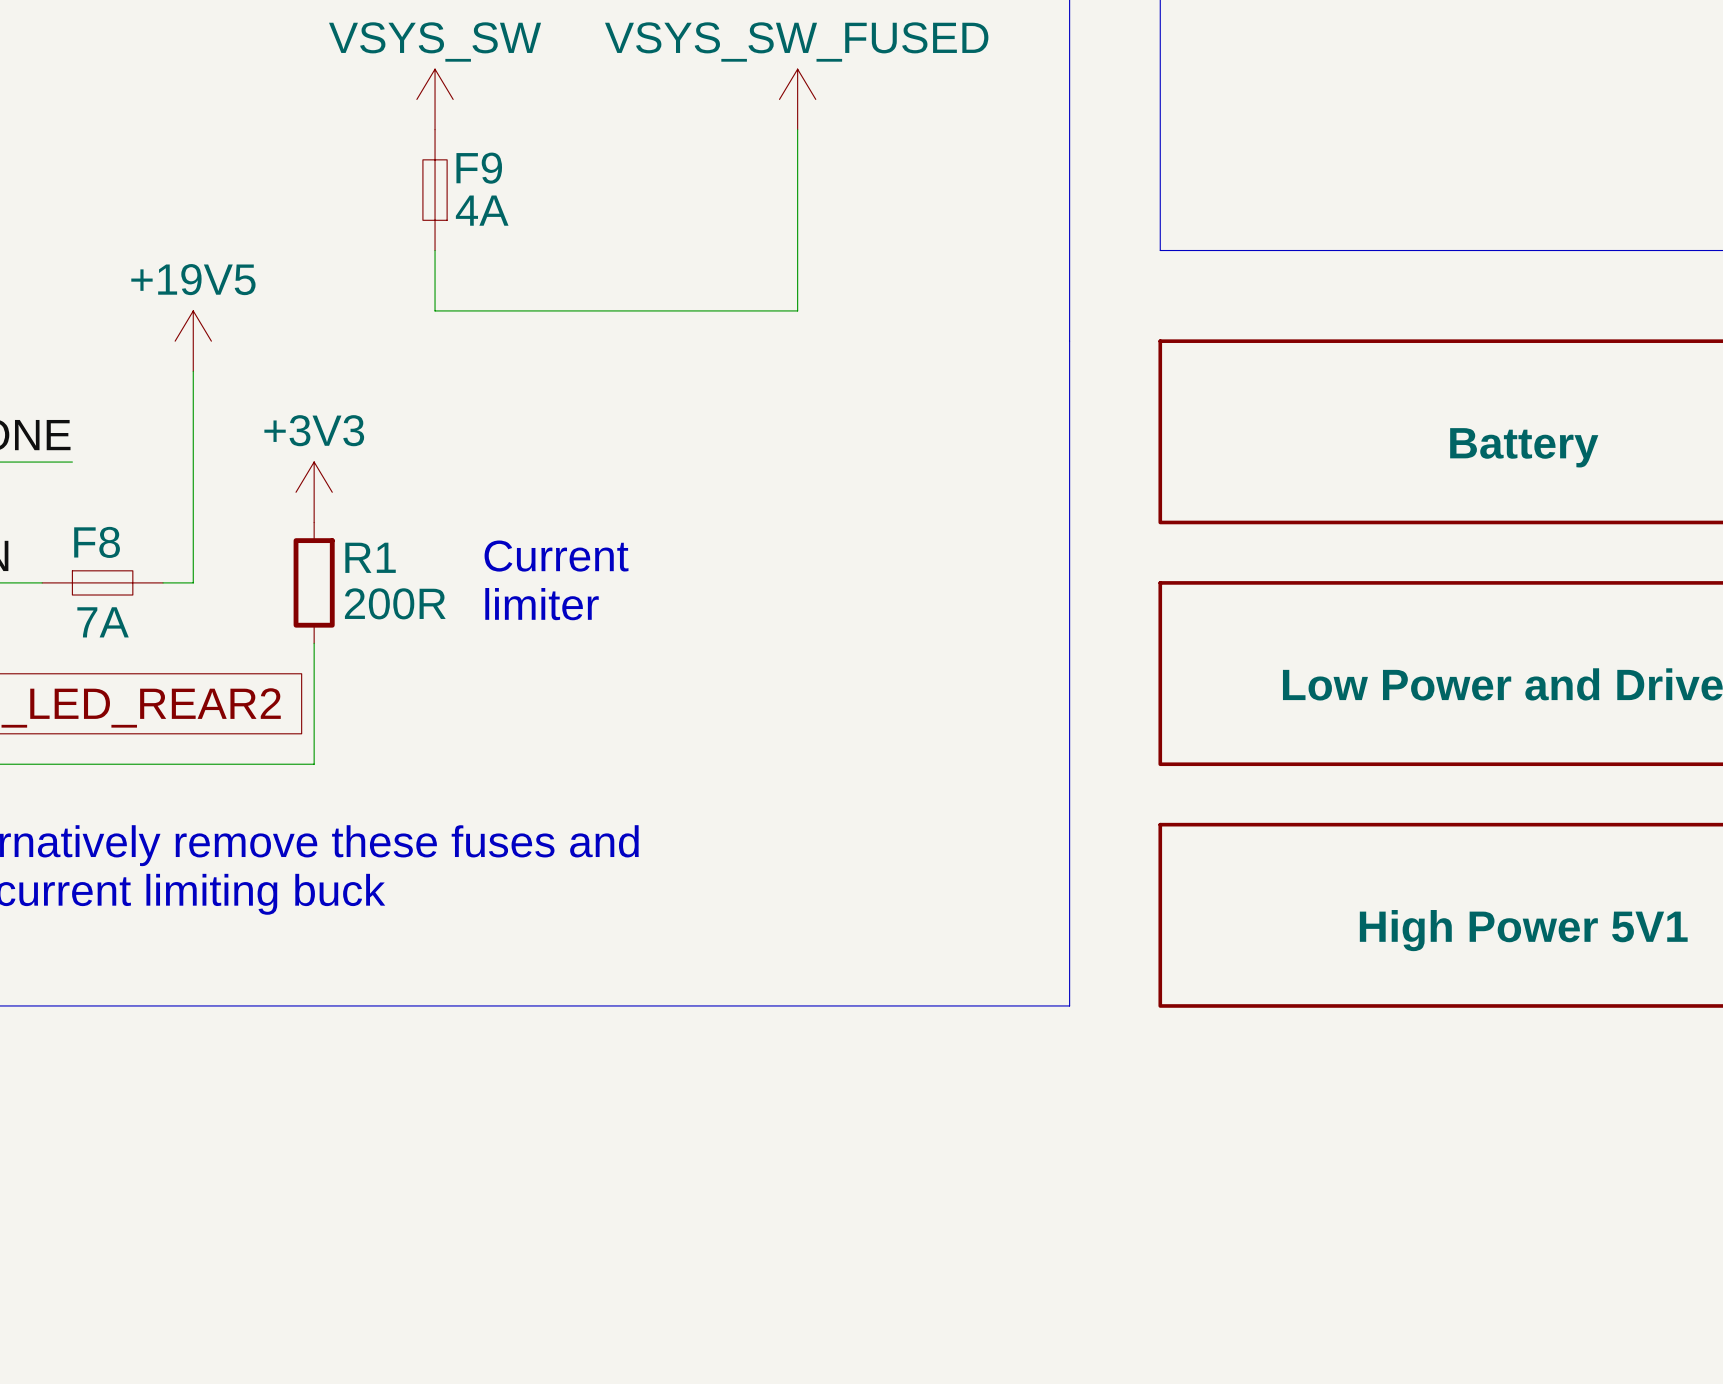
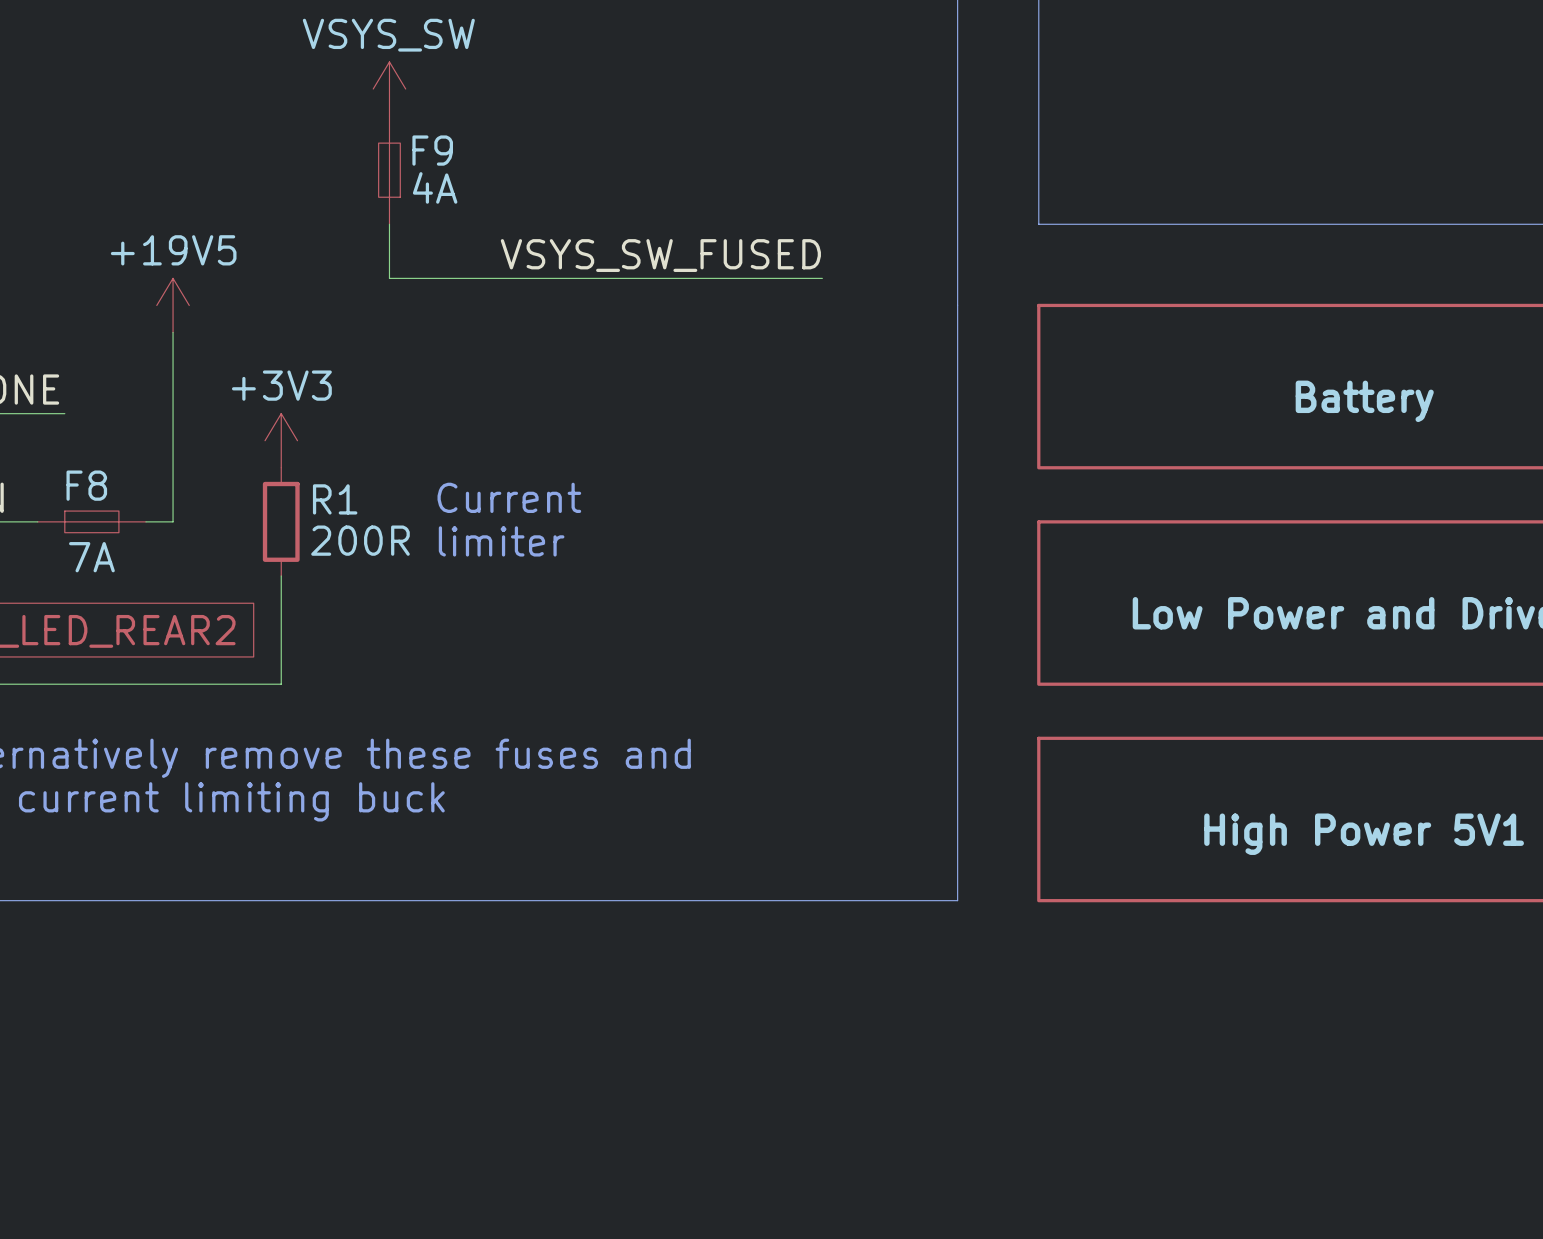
power symbol: VSYS_SW_FUSED (797, 99) -> none
wire: (797, 129) (797, 310) -> (822, 278) (714, 278)
label: none -> VSYS_SW_FUSED (660, 255)

